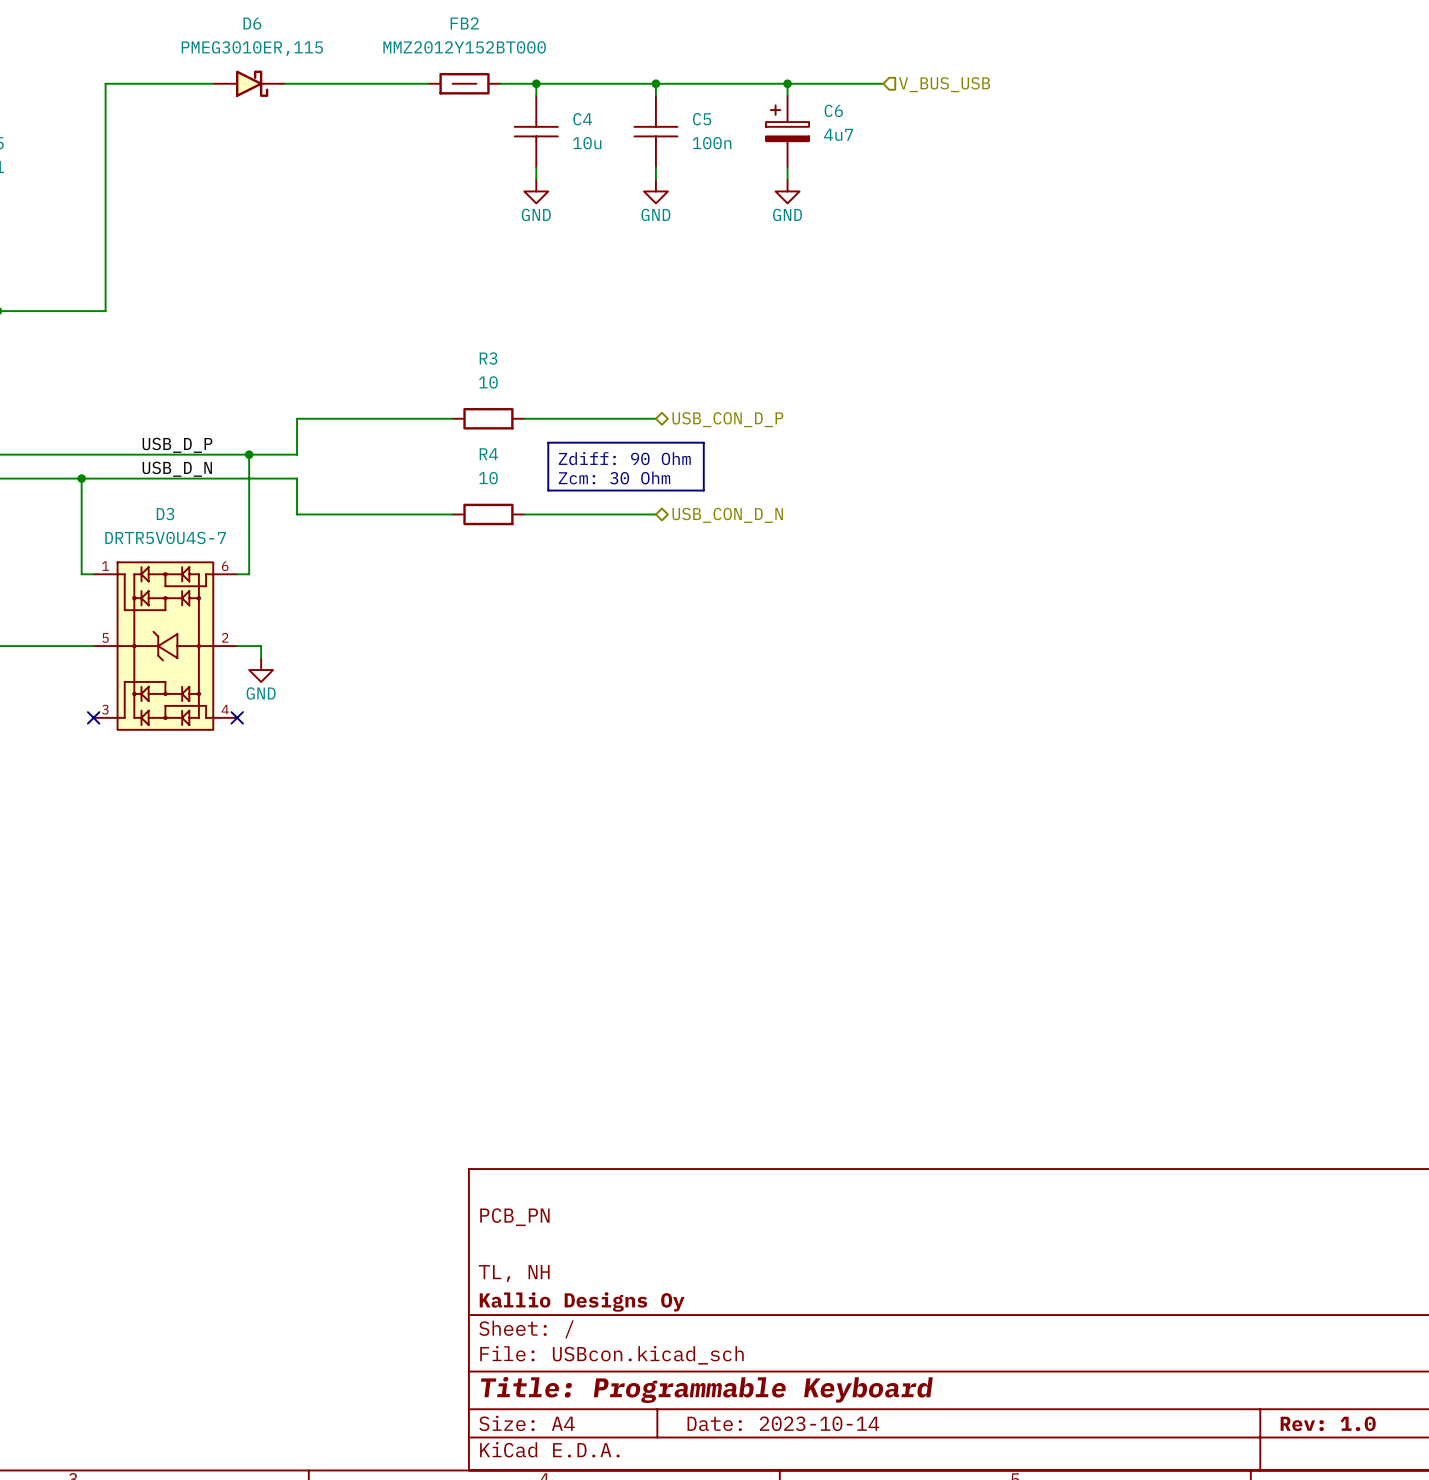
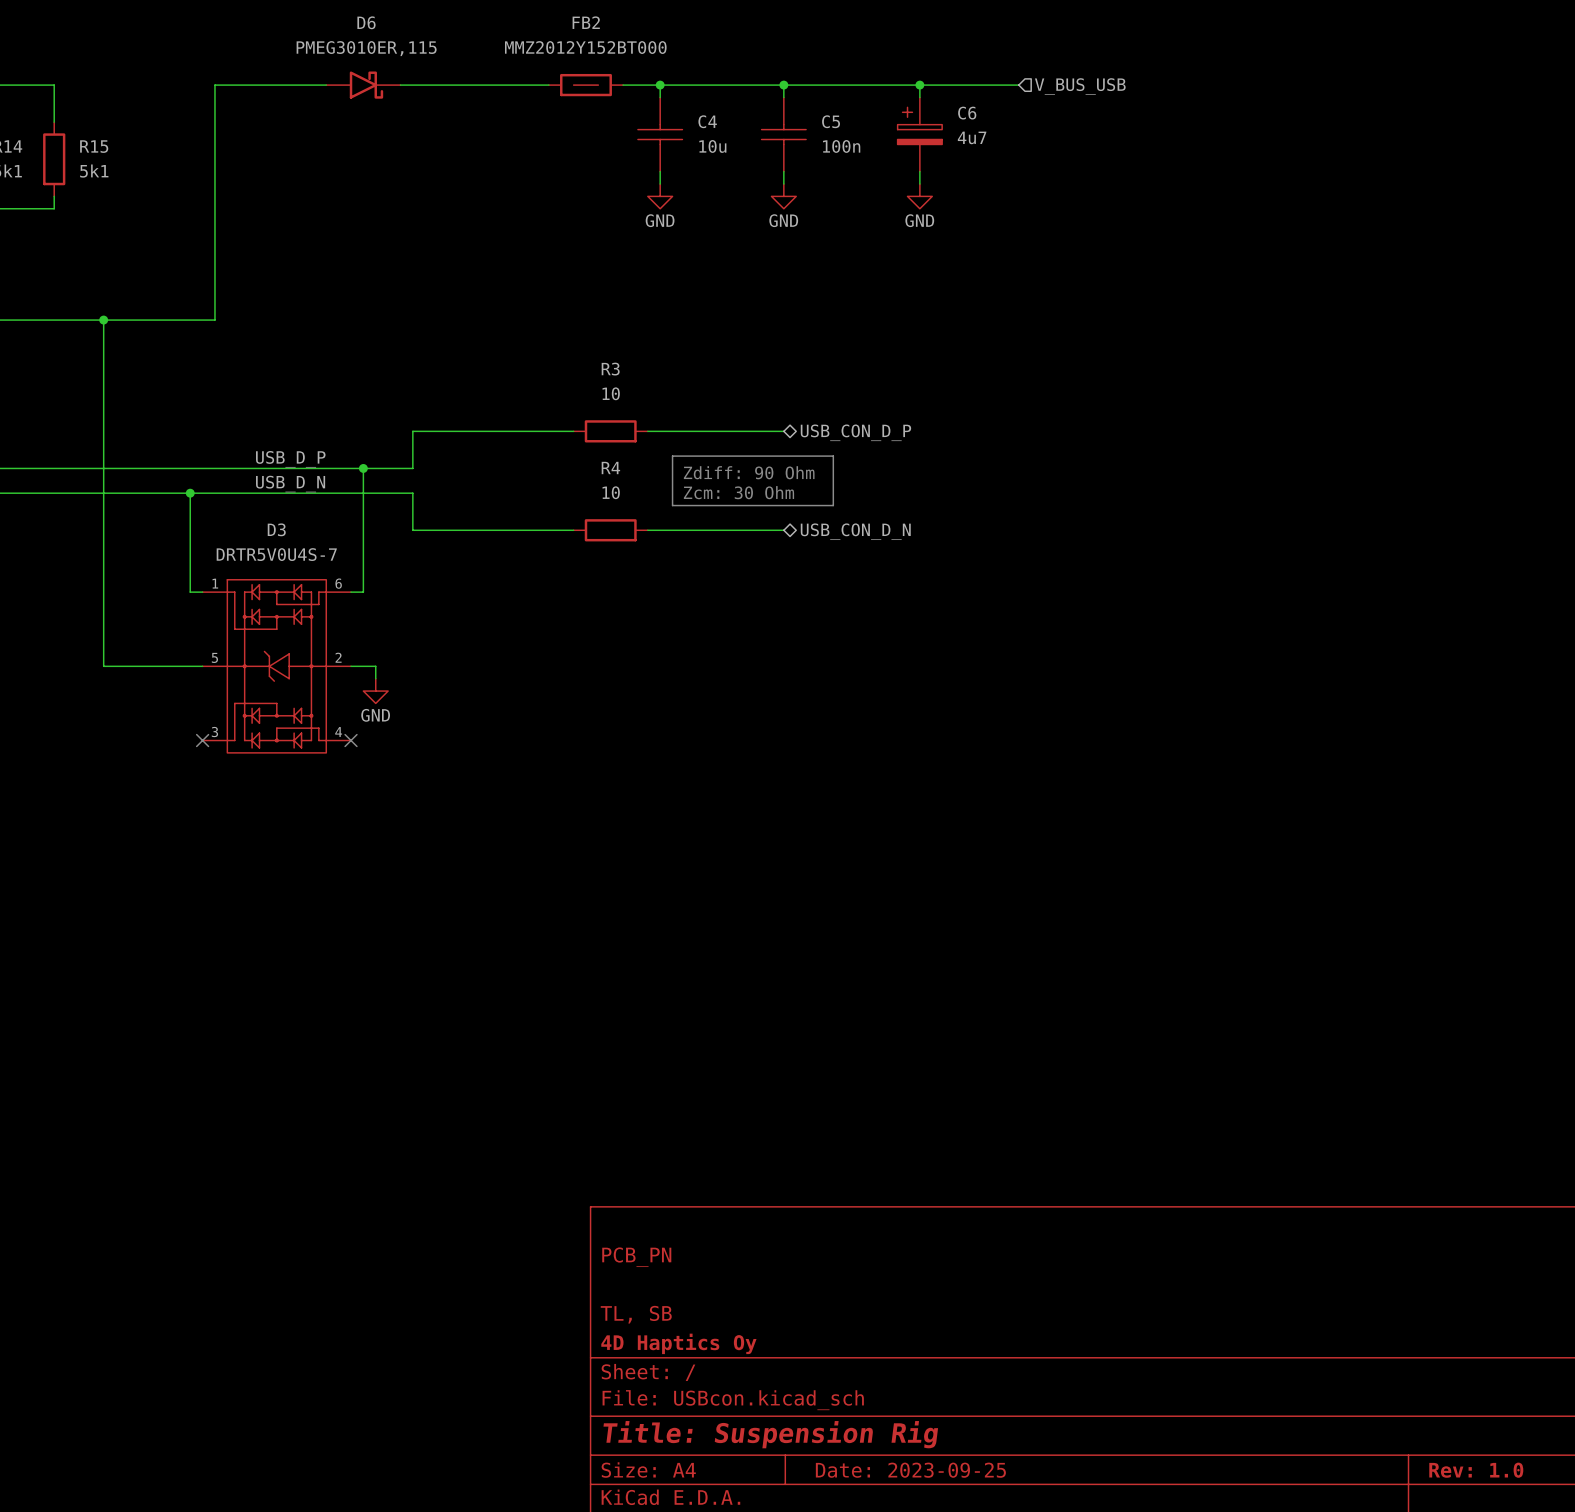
title block: TL, NH (514, 1273) -> TL, SB (636, 1314)
title block: Kallio Designs Oy (582, 1301) -> 4D Haptics Oy (678, 1343)
title block: Title: Programmable Keyboard (706, 1389) -> Title: Suspension Rig (770, 1434)
title block: Date: 2023-10-14 (783, 1423) -> Date: 2023-09-25 (910, 1470)

